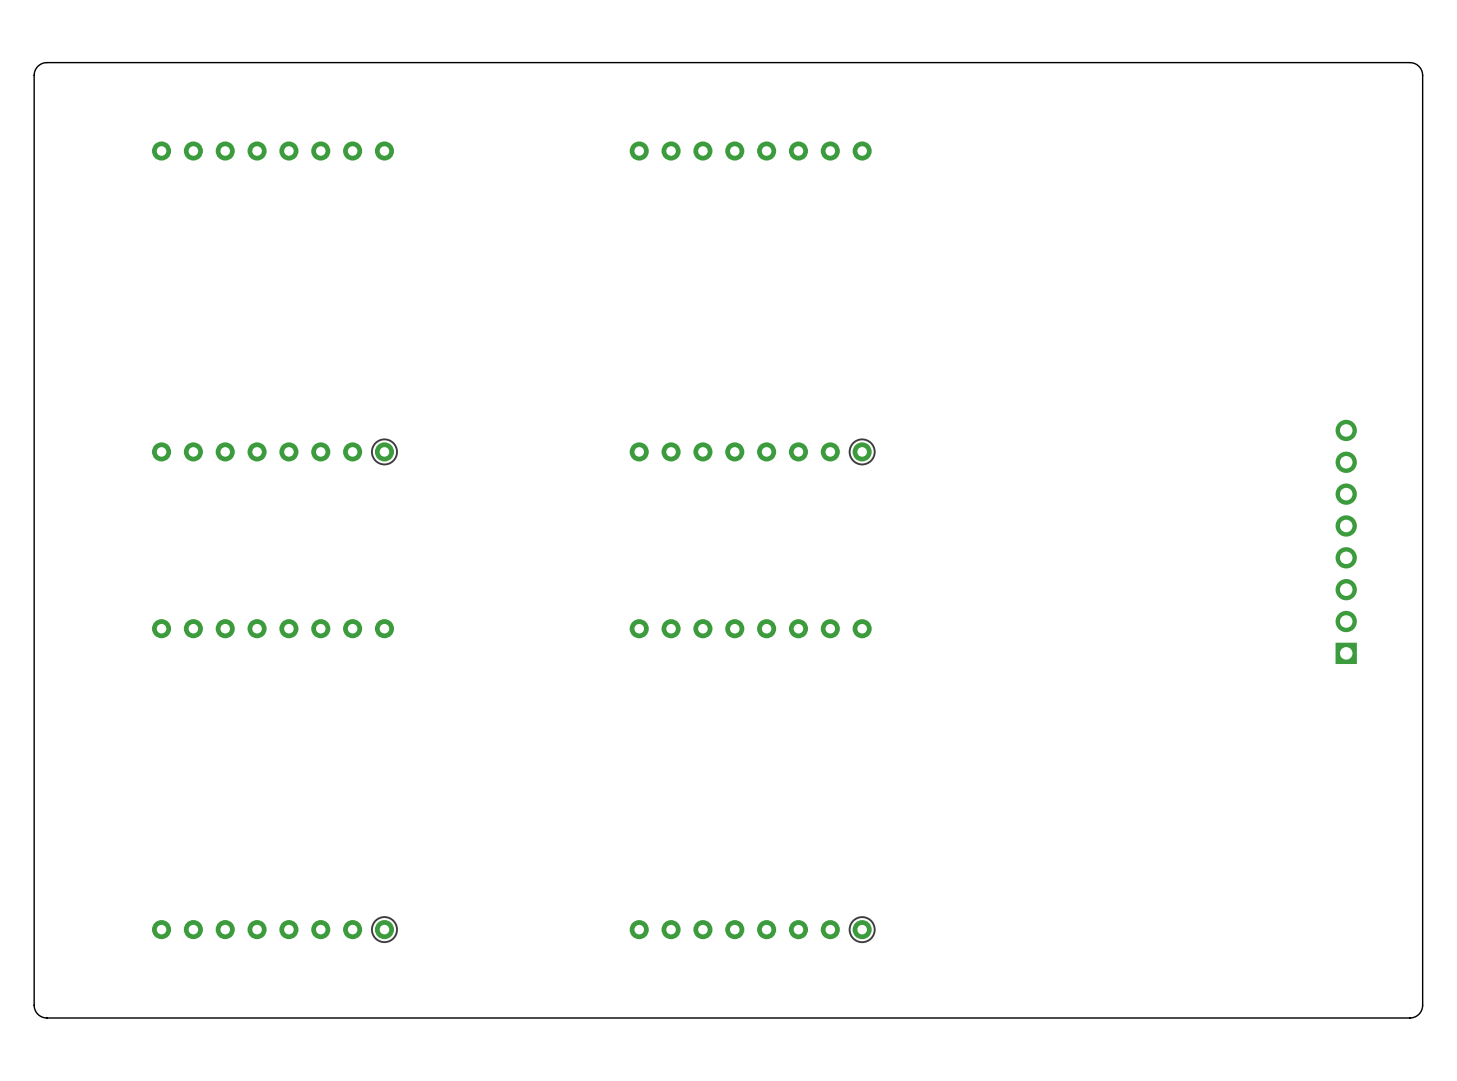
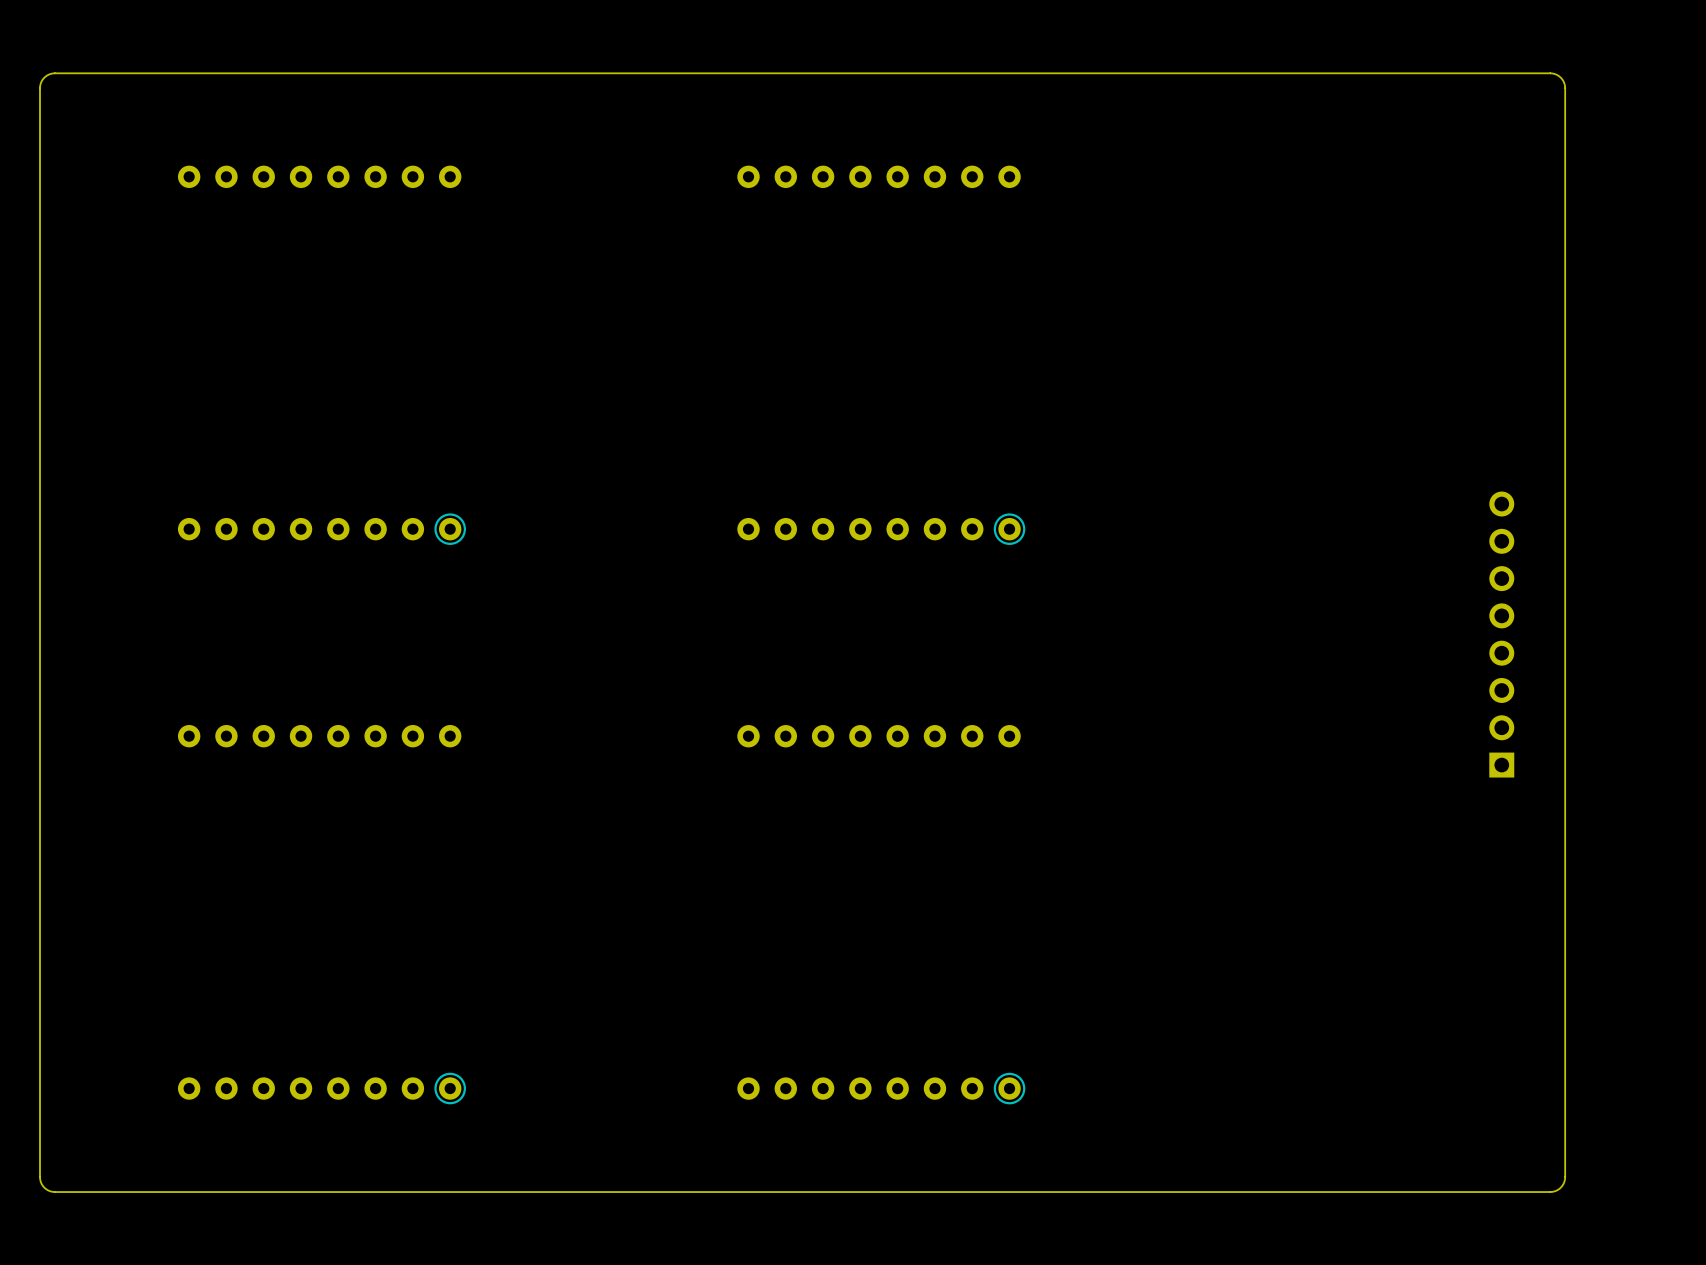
board edge: (1323, 62) (1411, 62) (1420, 67) (1422, 75) (1422, 1006) (1418, 1014) (1411, 1017) (1323, 1017) -> (1550, 73) (1560, 77) (1565, 88) (1565, 1177) (1560, 1187) (1550, 1192)
part position: (1346, 541) -> (1501, 634)

